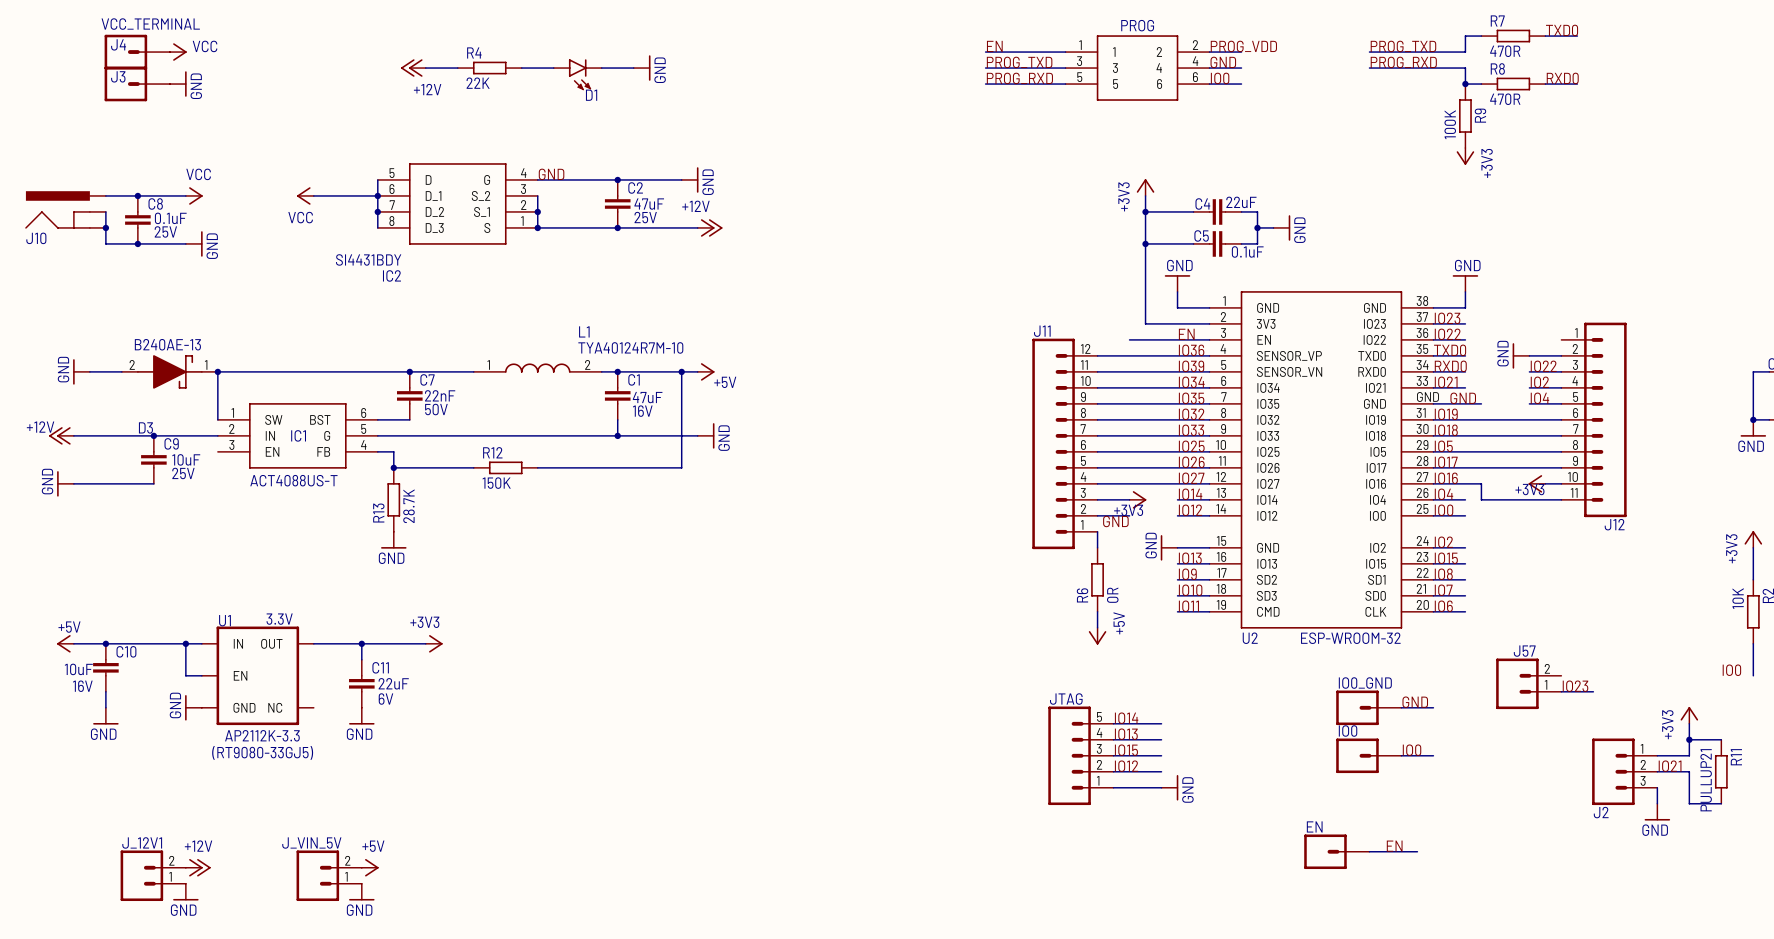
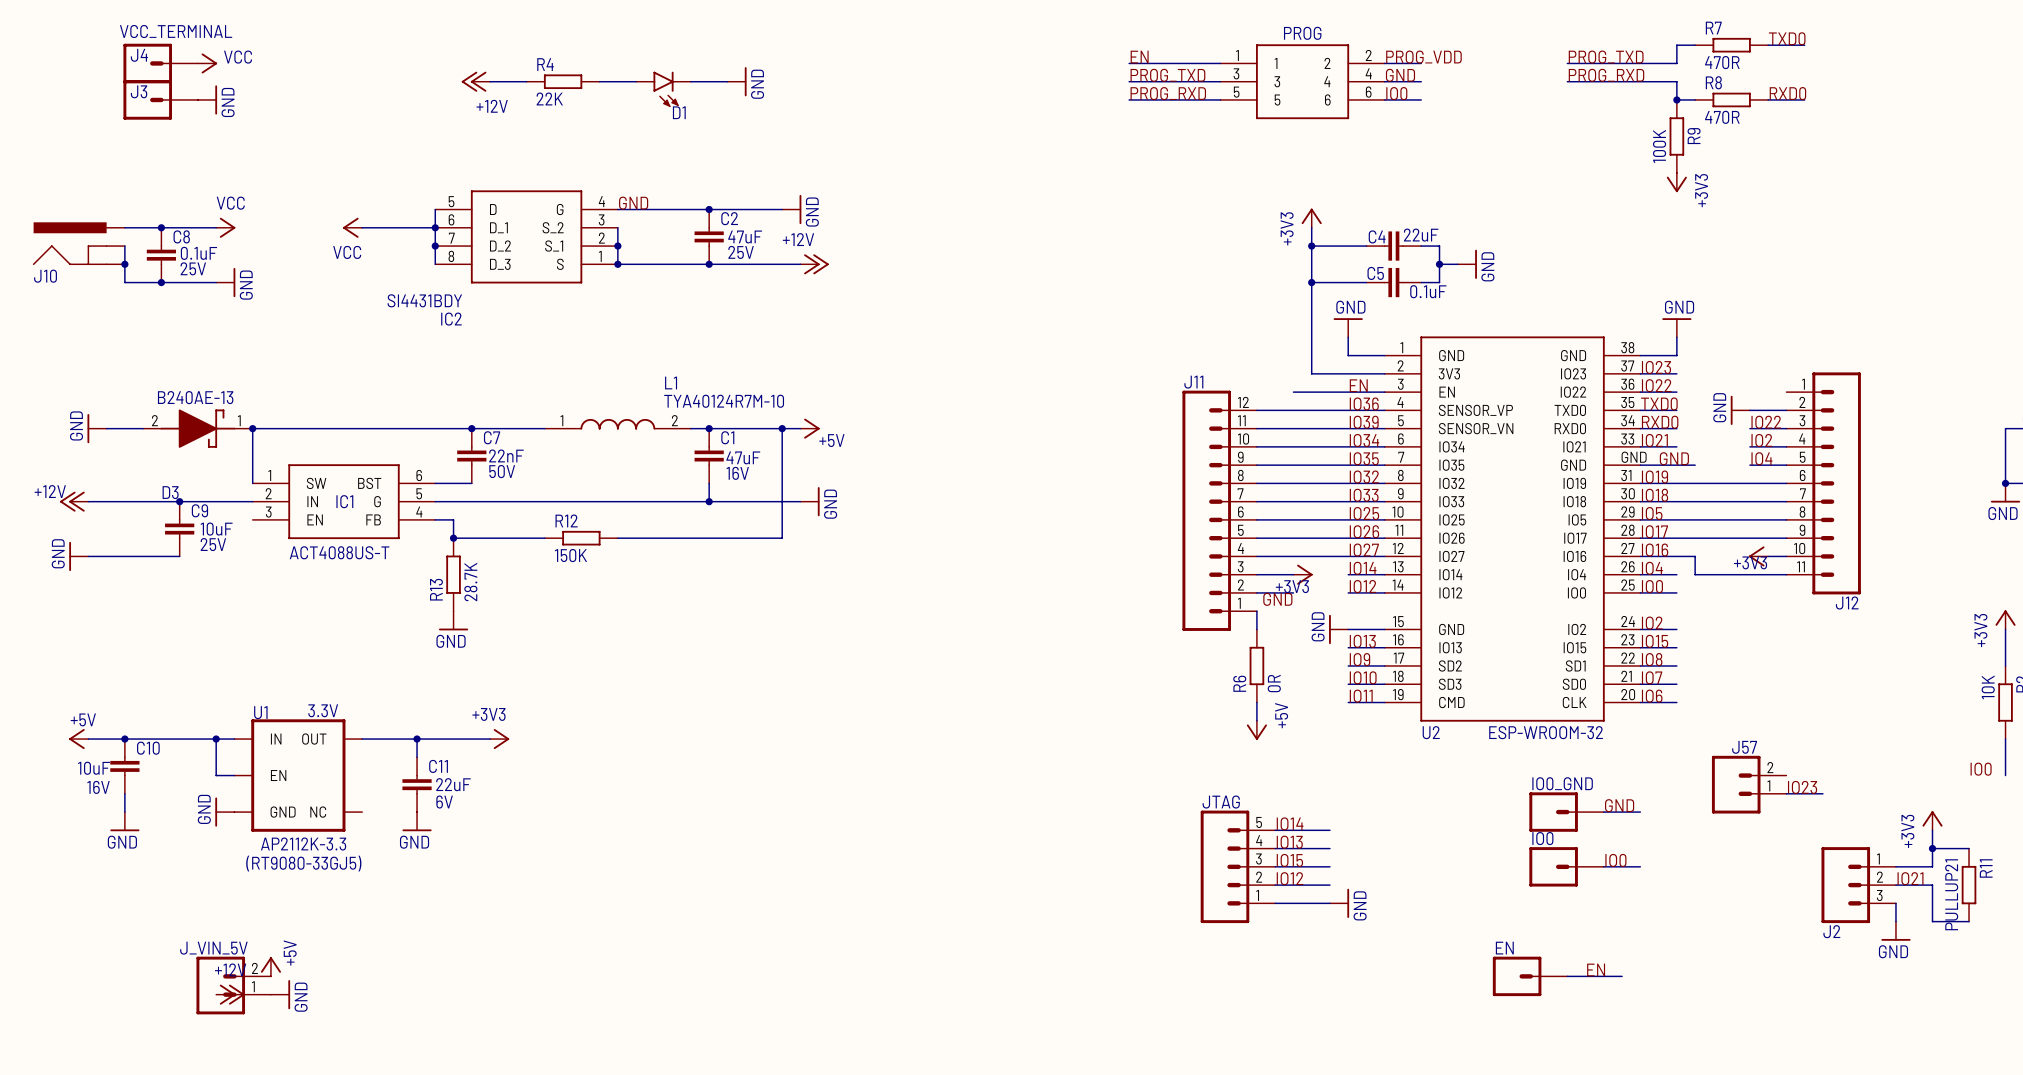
power symbol text position: +5V (373, 846) -> +5V (290, 952)
power symbol: none -> GND (280, 994)
power symbol position: +5V (370, 867) -> +5V (270, 966)
power symbol rotation: 0° (371, 867) -> 90° counterclockwise (270, 964)
J_12V1: (153, 875) -> none
J_VIN_5V position: (329, 875) -> (233, 985)
power symbol: GND (185, 892) -> none
power symbol: GND (361, 892) -> none

